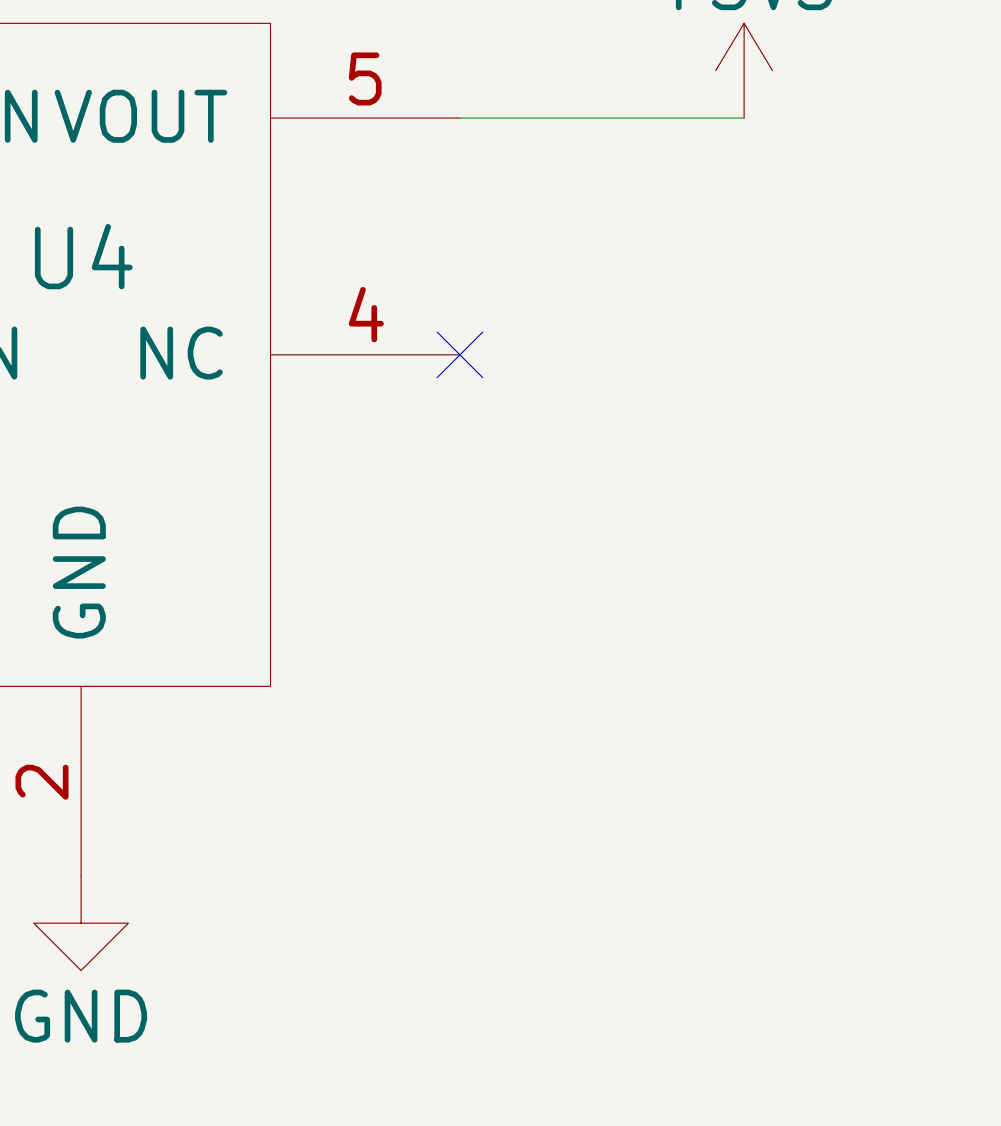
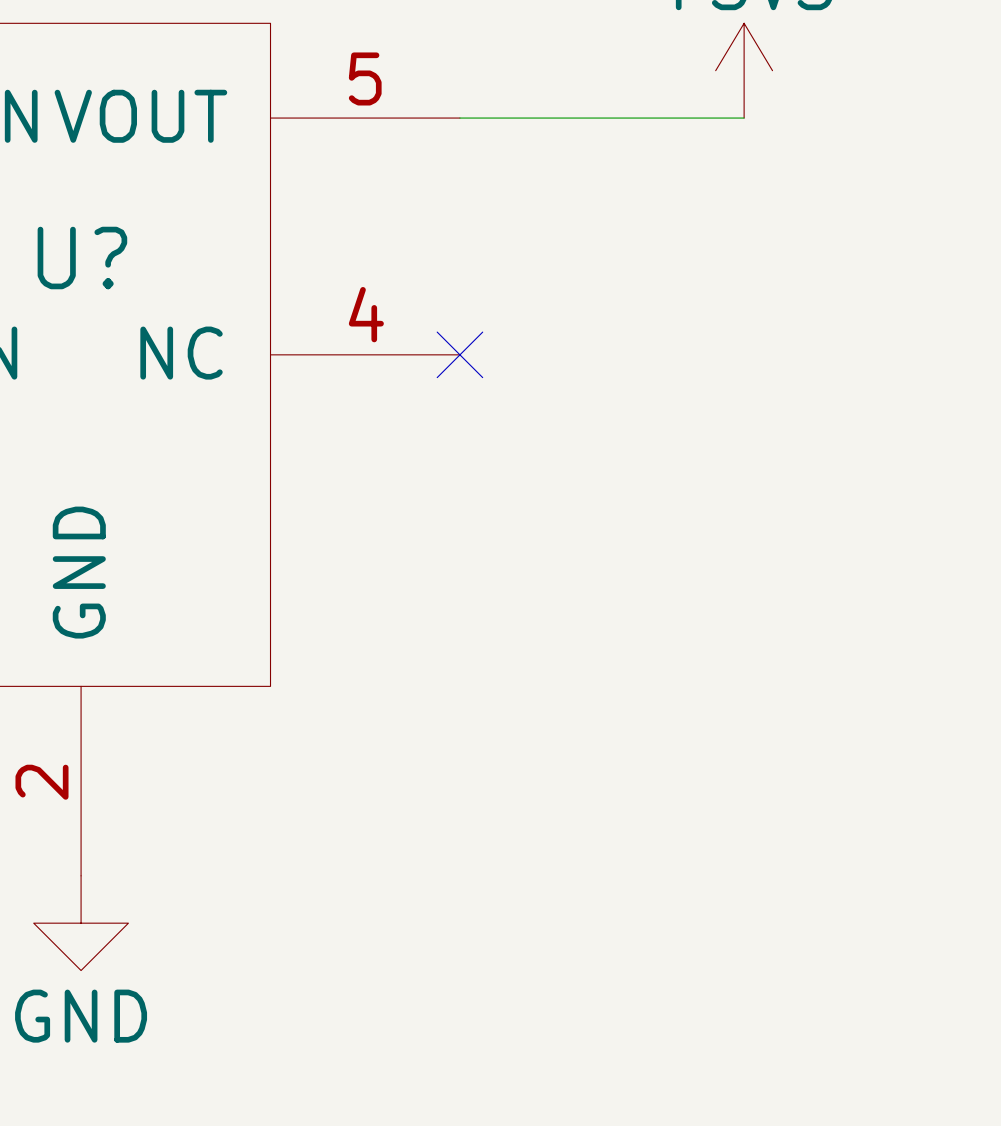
U4 name: U4 (83, 256) -> U? (82, 258)

